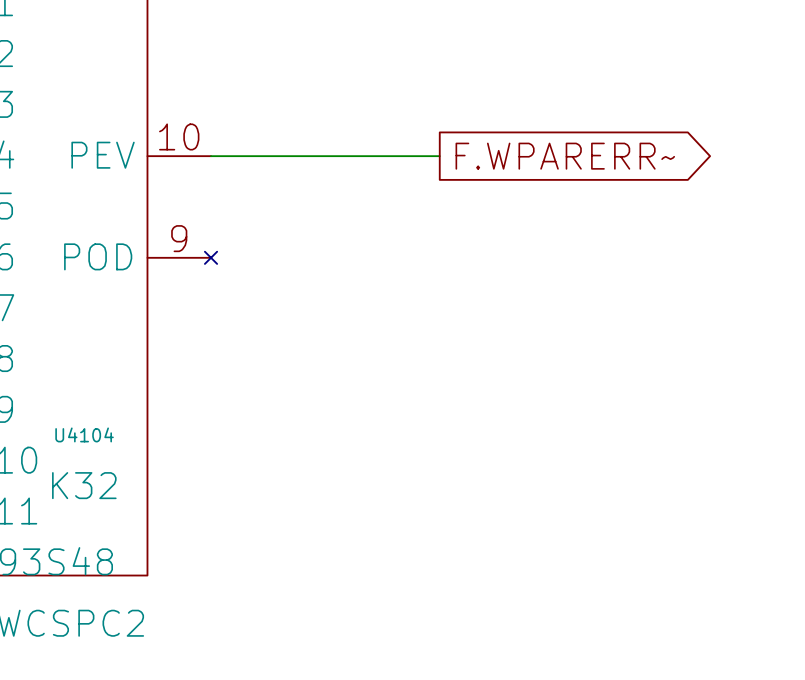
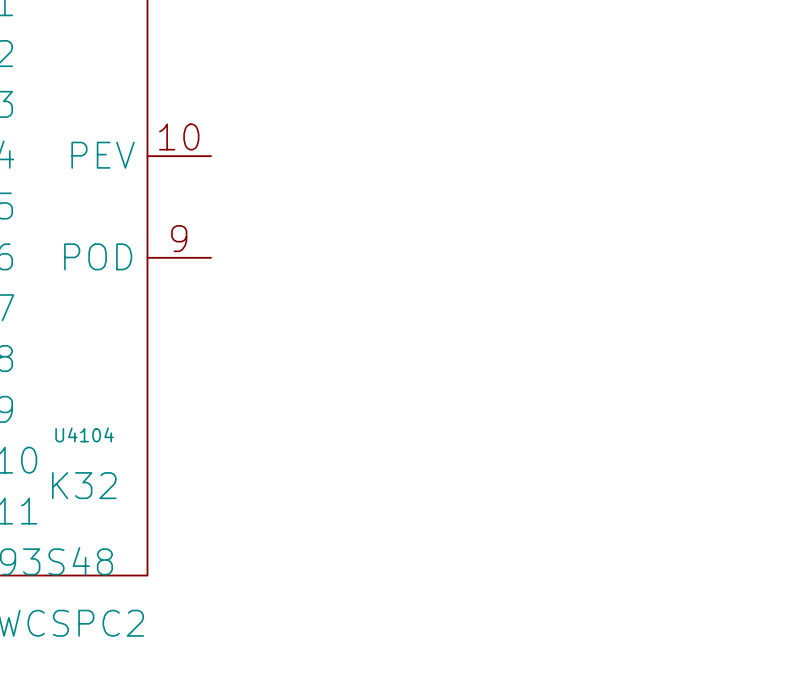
wire: (211, 156) (439, 156) -> none
global label: F.WPARERR~ (565, 156) -> none
no-connect mark: (211, 257) -> none

